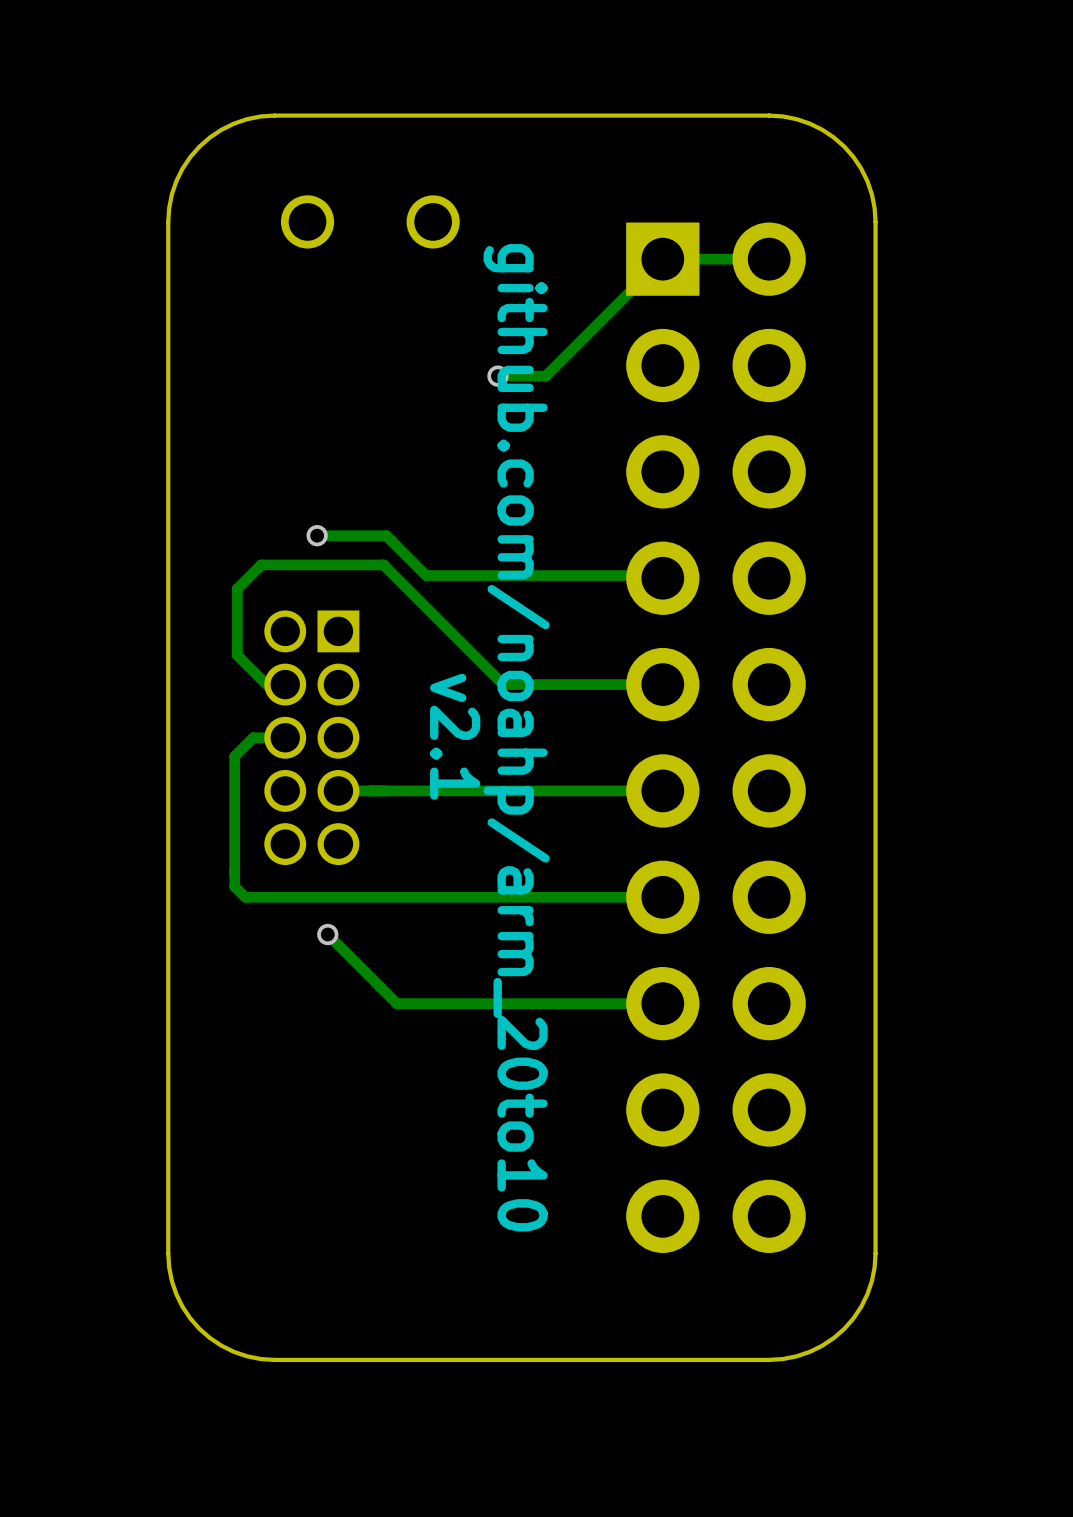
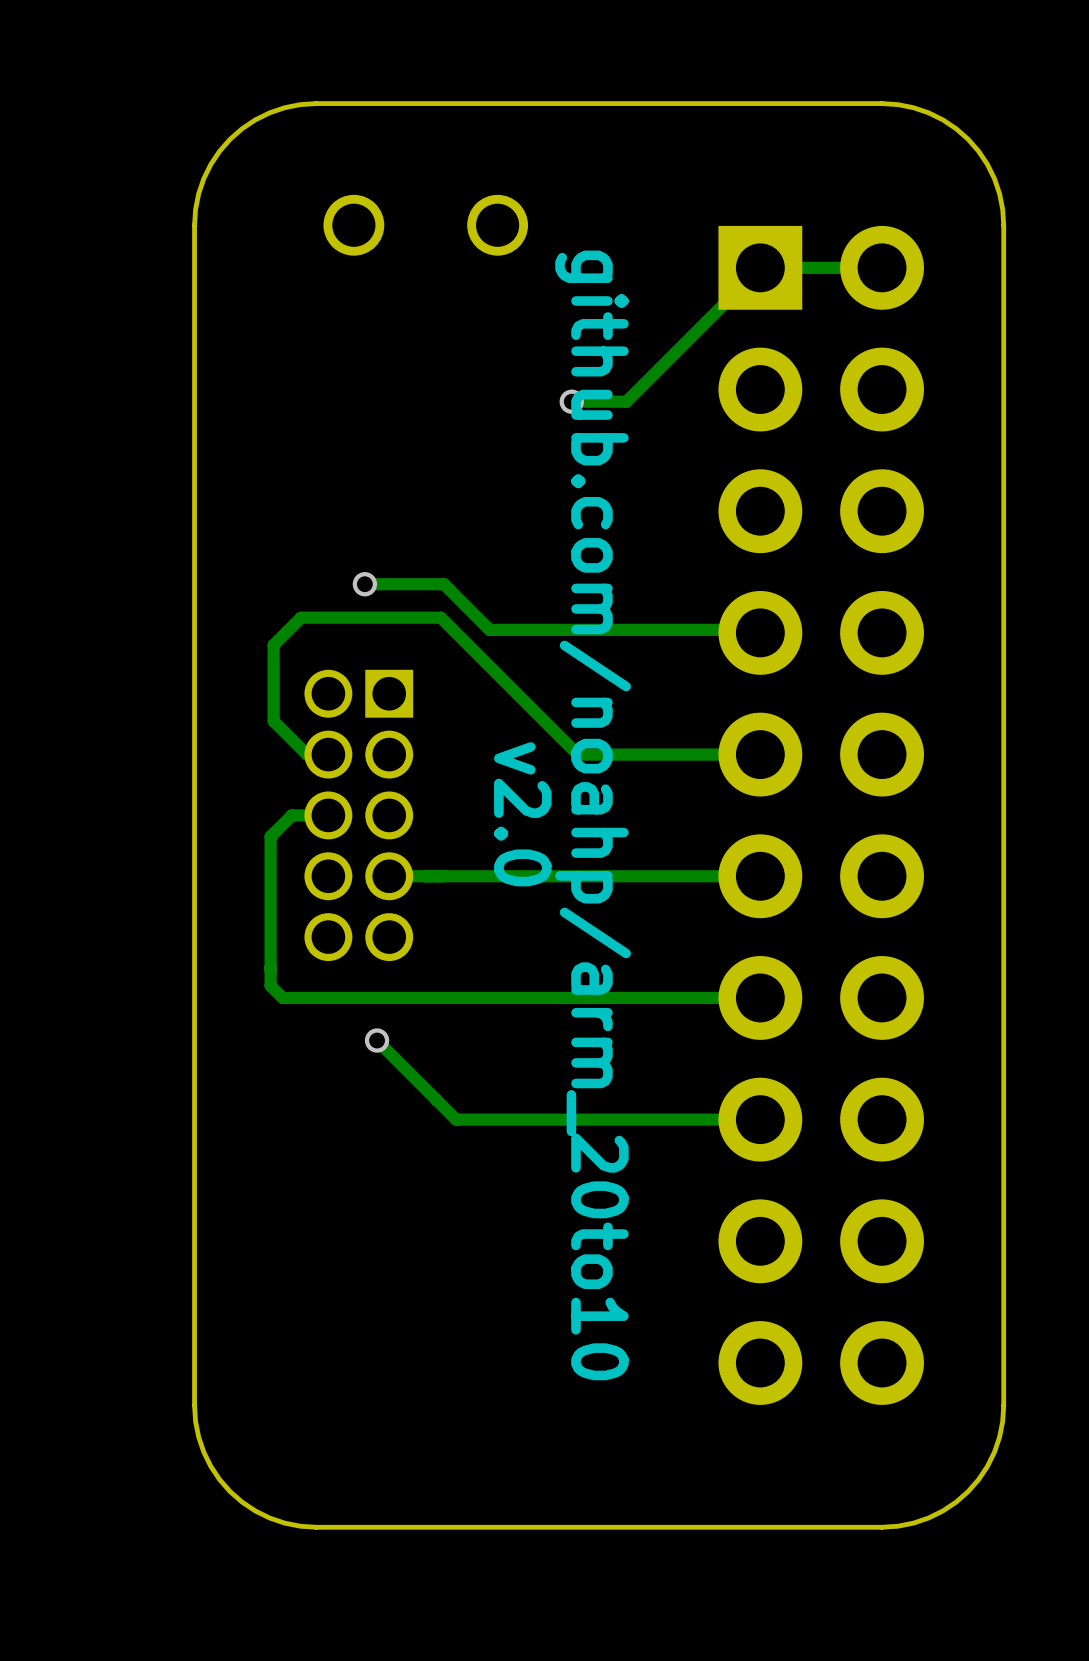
text: v2.1 (455, 736) -> v2.0 (522, 814)

